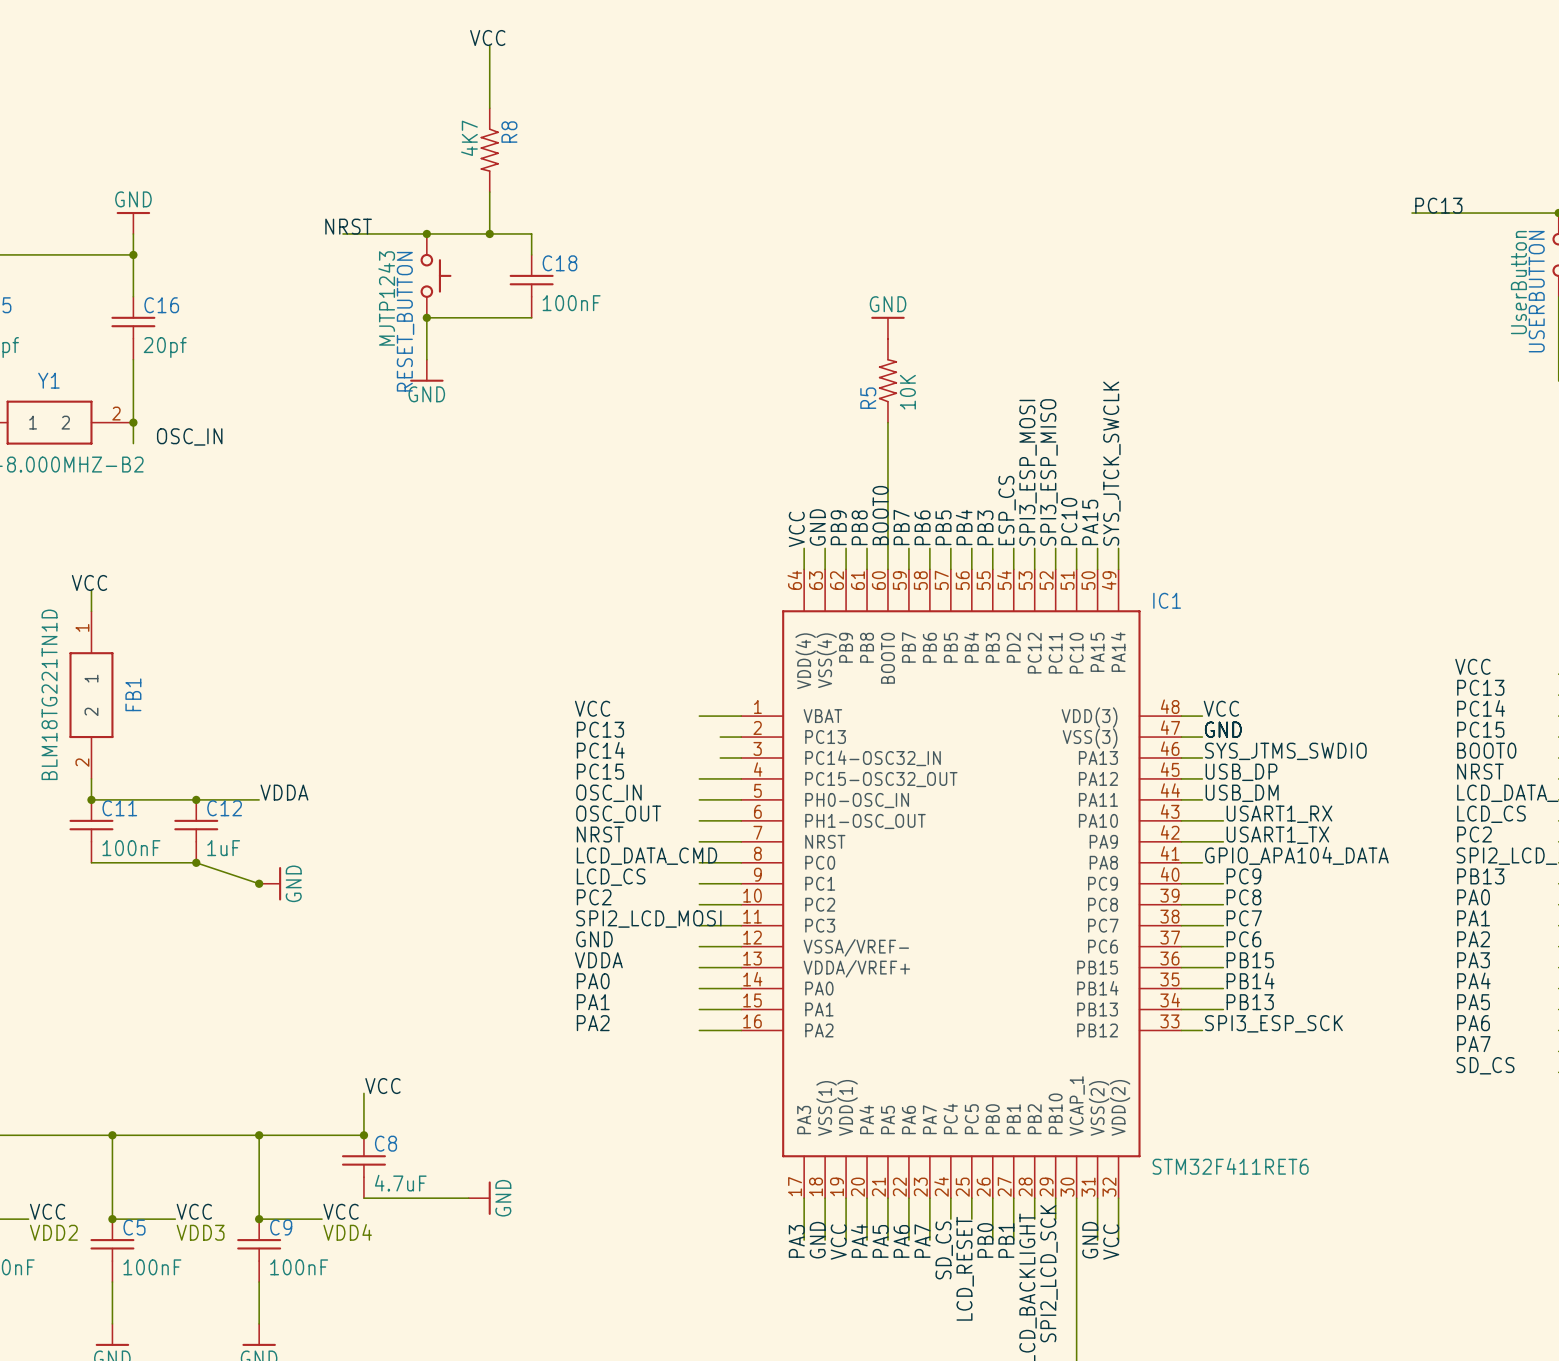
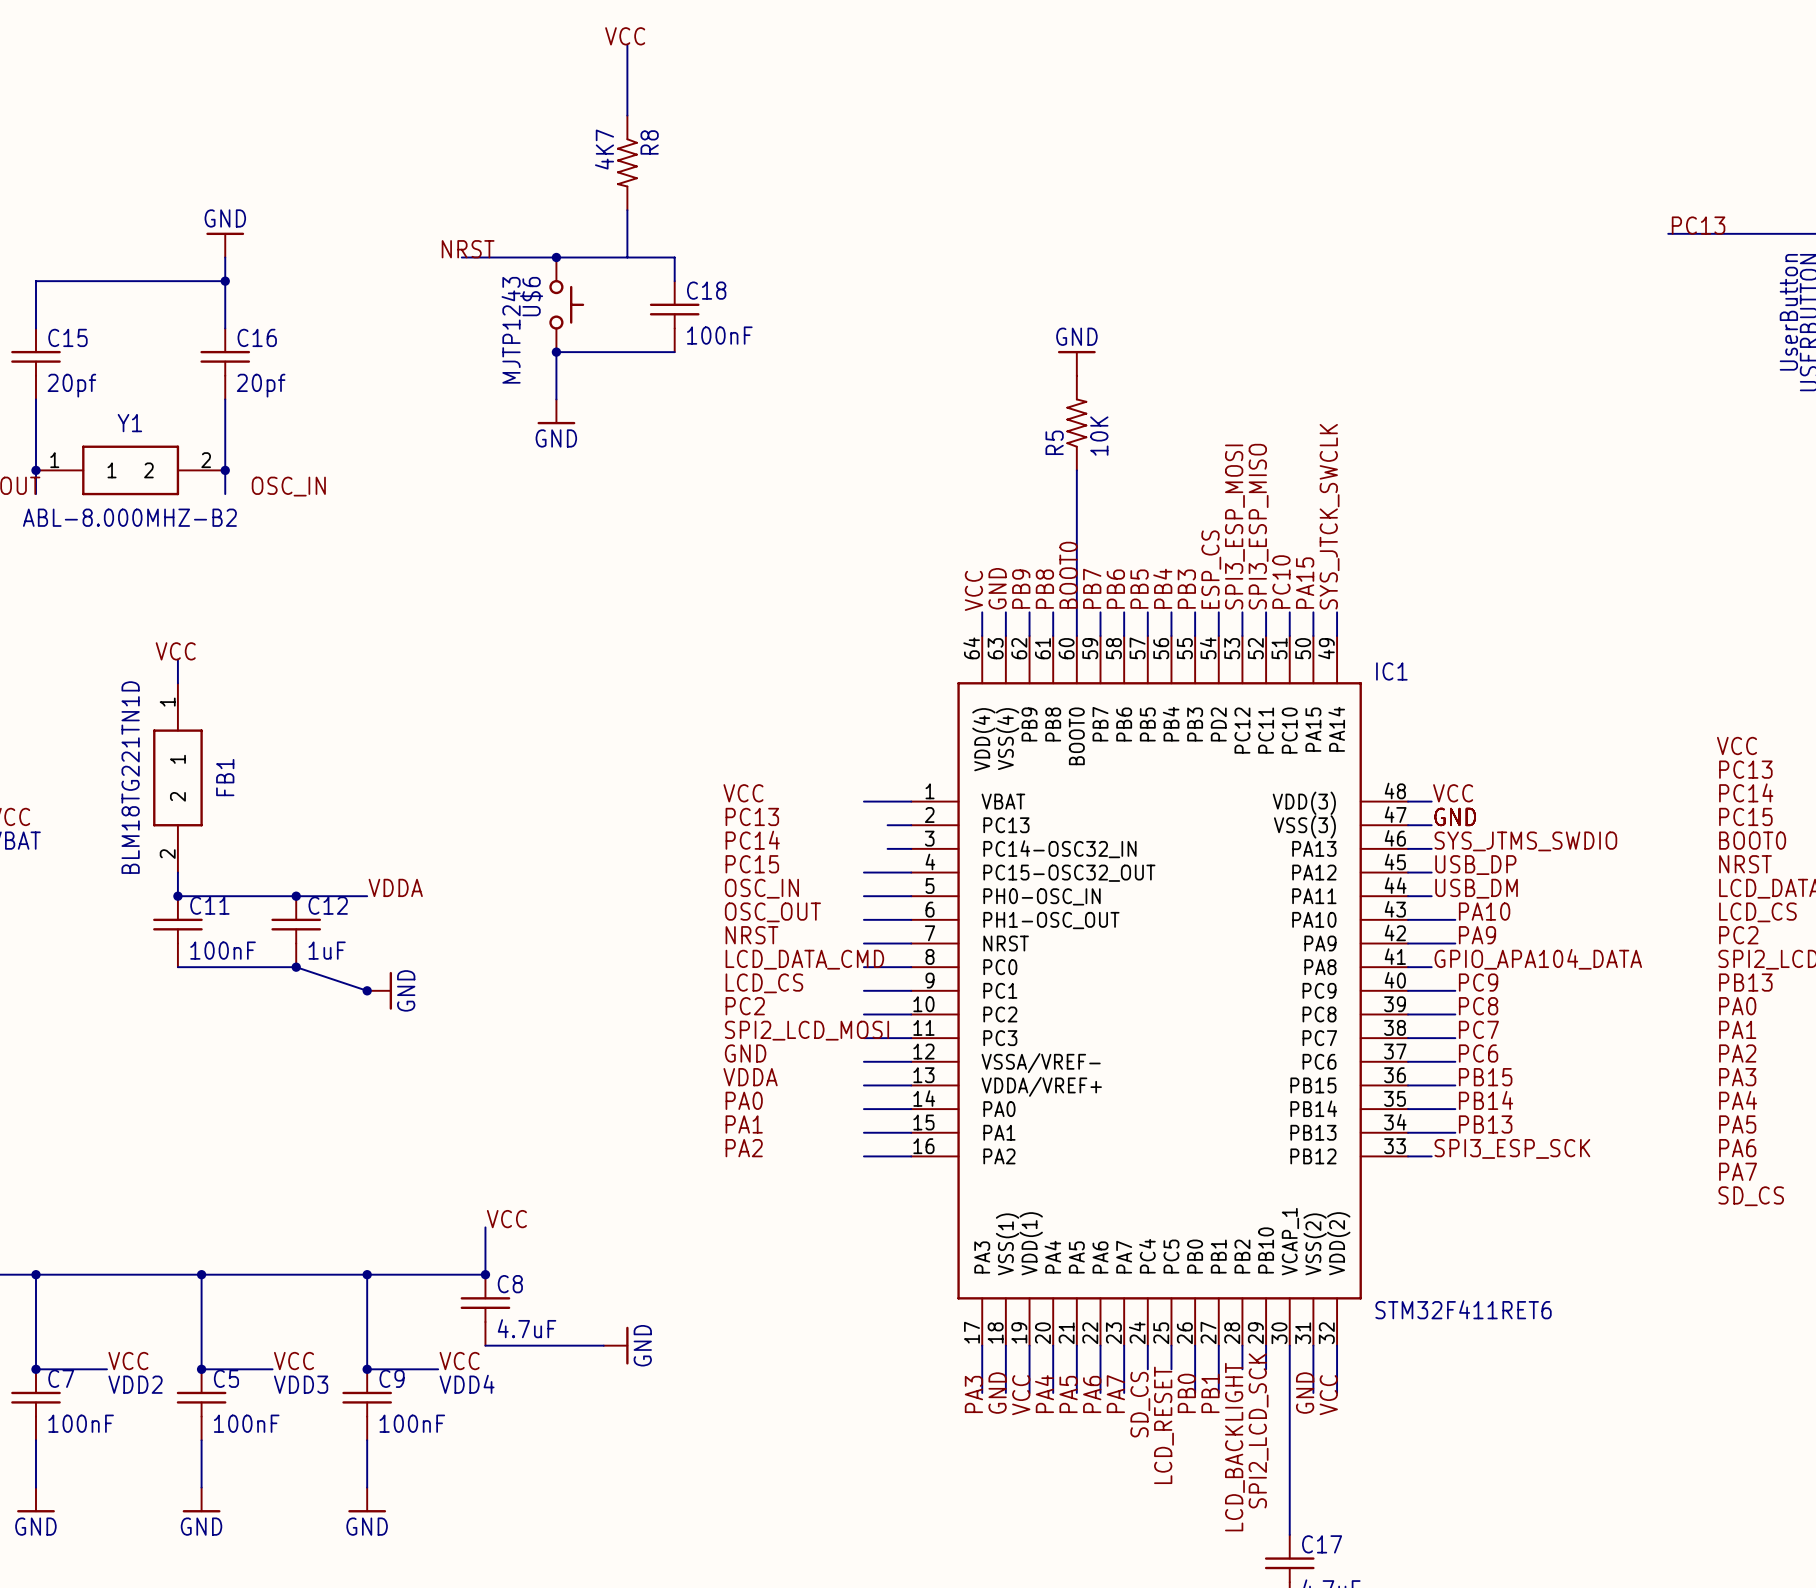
junction: (489, 233) -> none
RESET_BUTTON name: RESET_BUTTON (405, 321) -> U$6 (531, 296)
label: USART1_RX (1279, 814) -> PA10 (1484, 911)
label: USART1_TX (1277, 835) -> PA9 (1477, 935)

